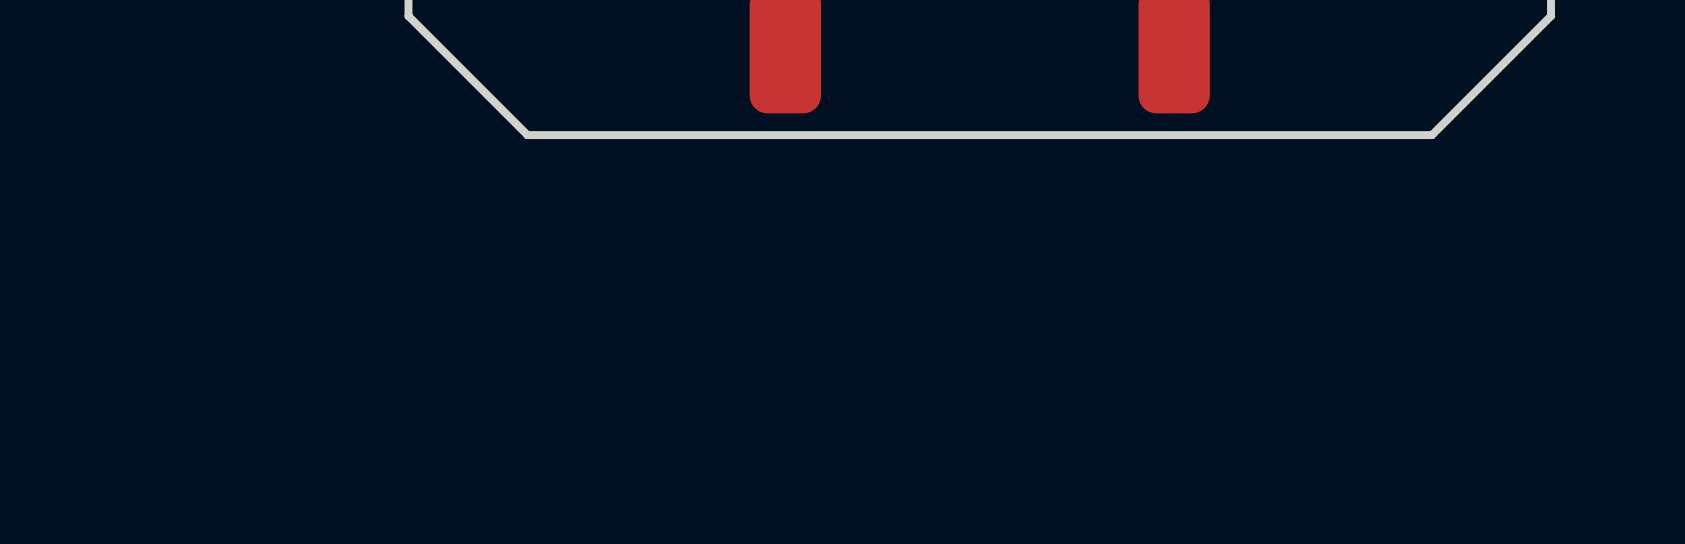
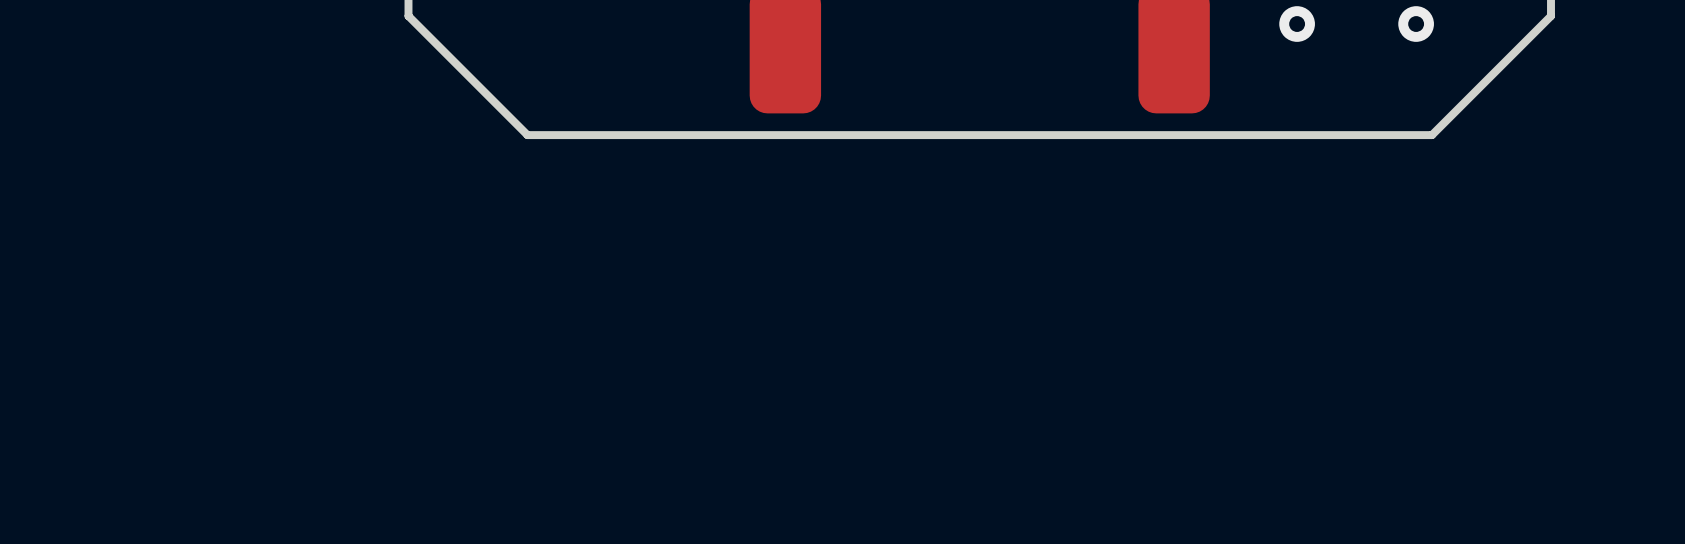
via: none -> (1297, 24)
via: none -> (1416, 24)

